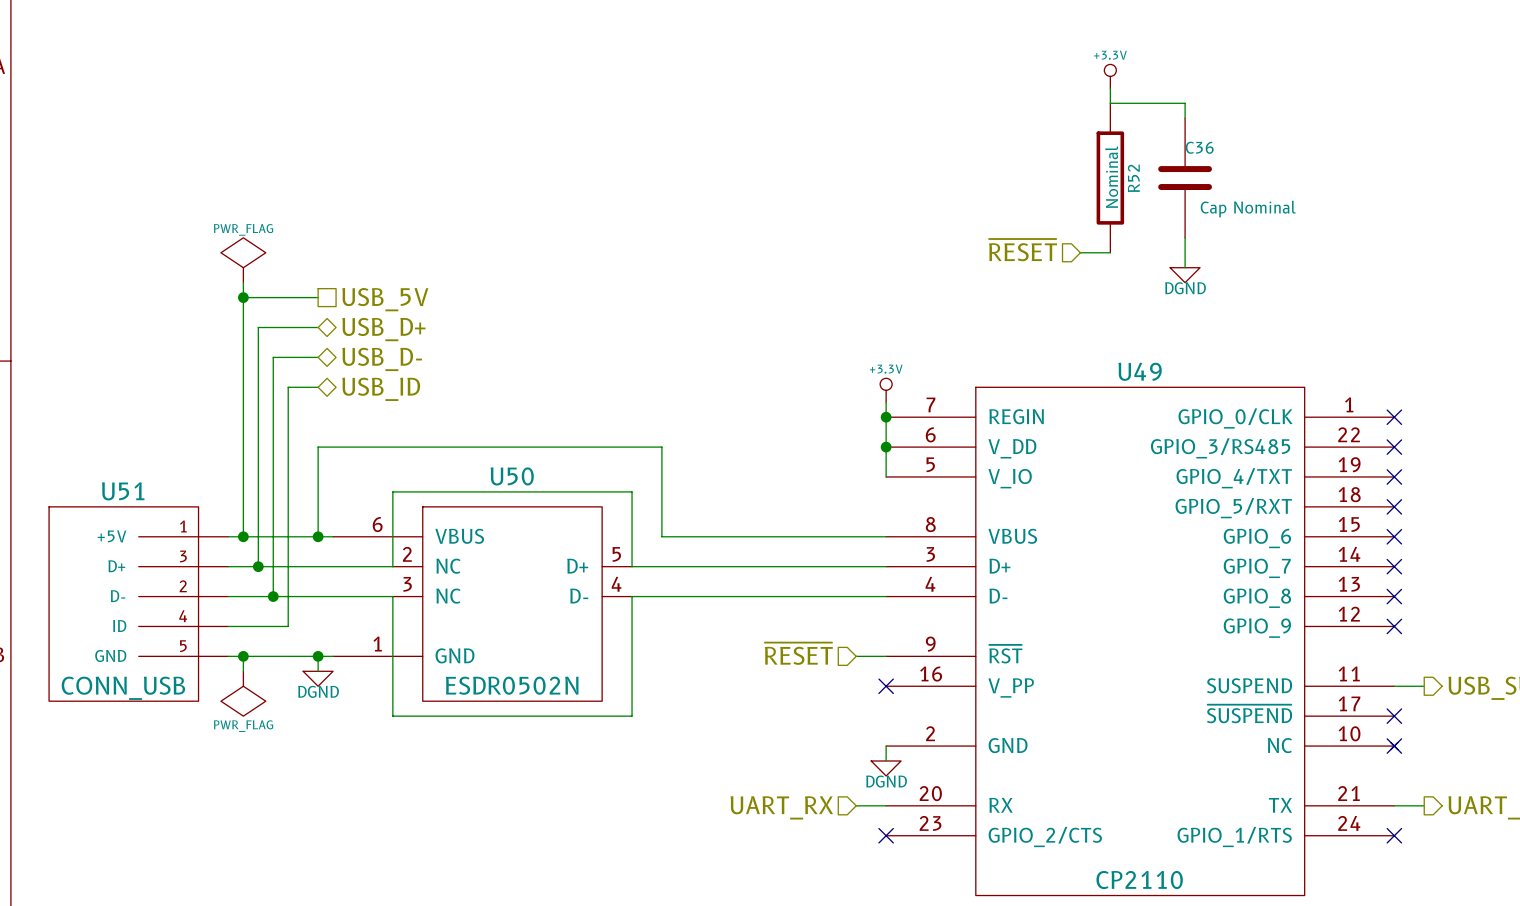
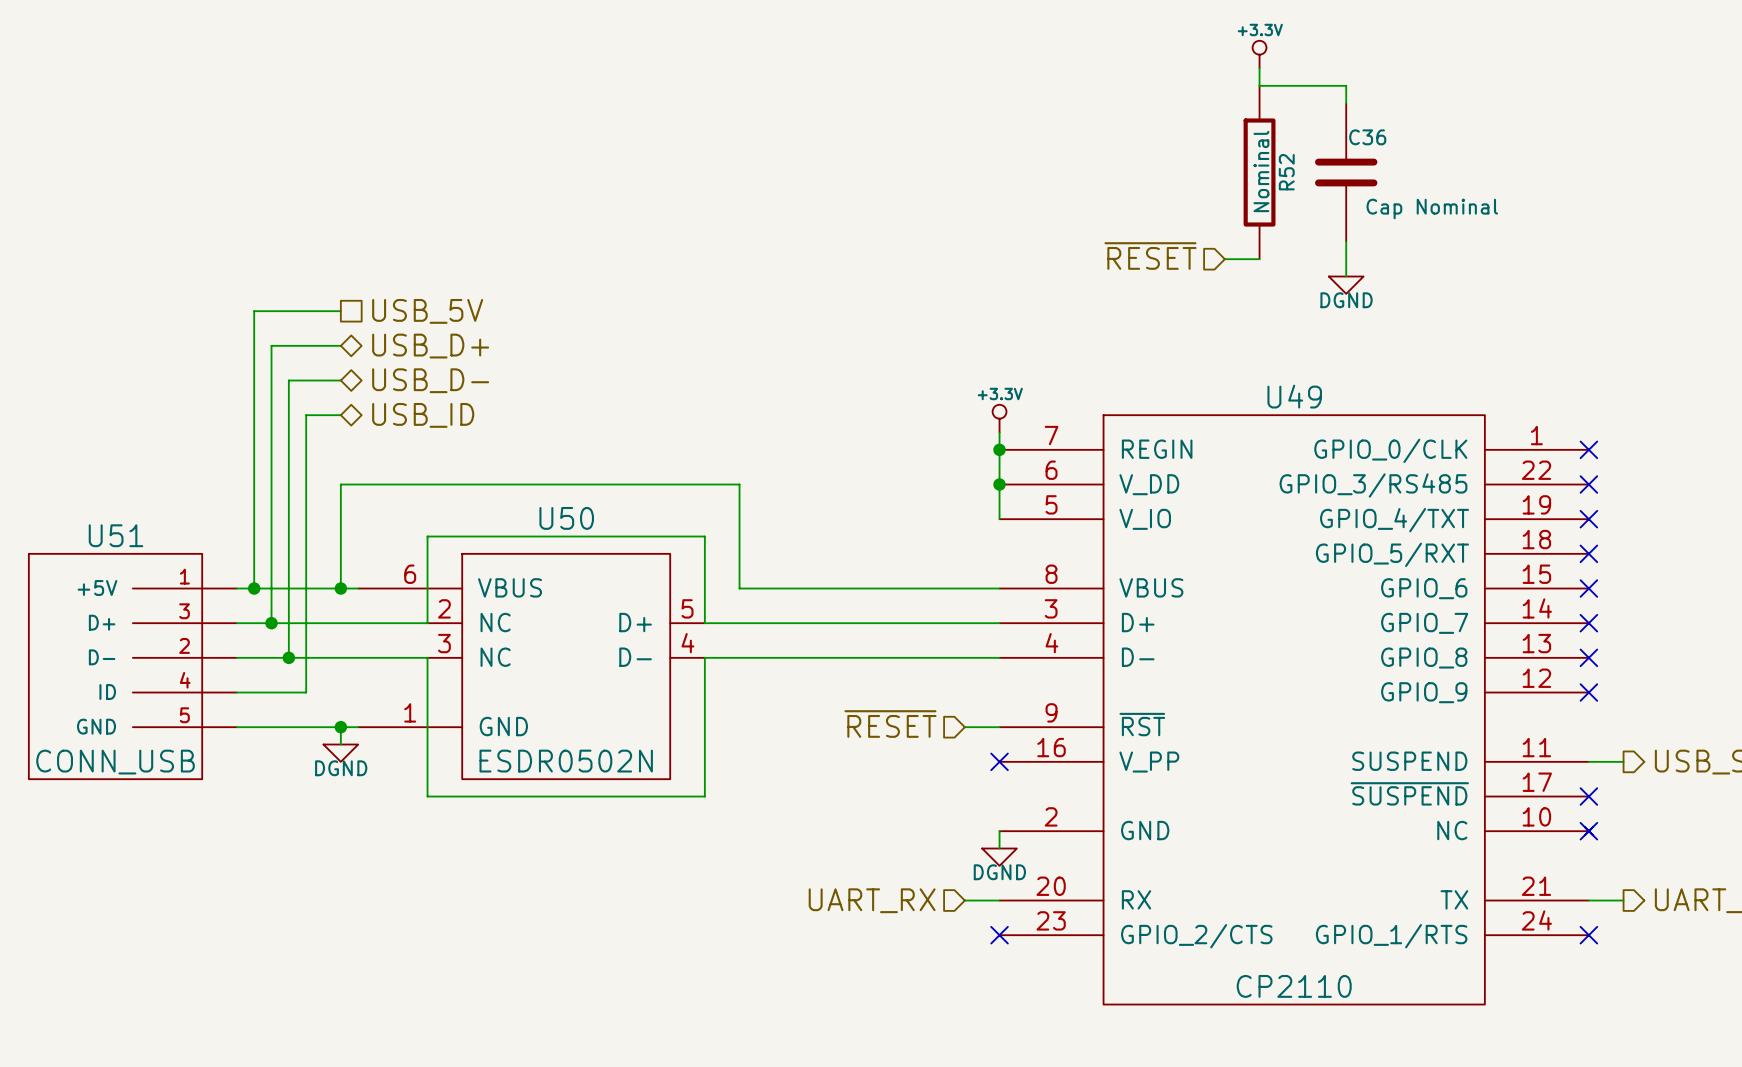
power symbol: PWR_FLAG (243, 260) -> none
wire: (243, 282) (243, 297) -> none
junction: (243, 297) -> none
wire: (243, 656) (243, 671) -> none
junction: (243, 656) -> none
power symbol: PWR_FLAG (243, 693) -> none

